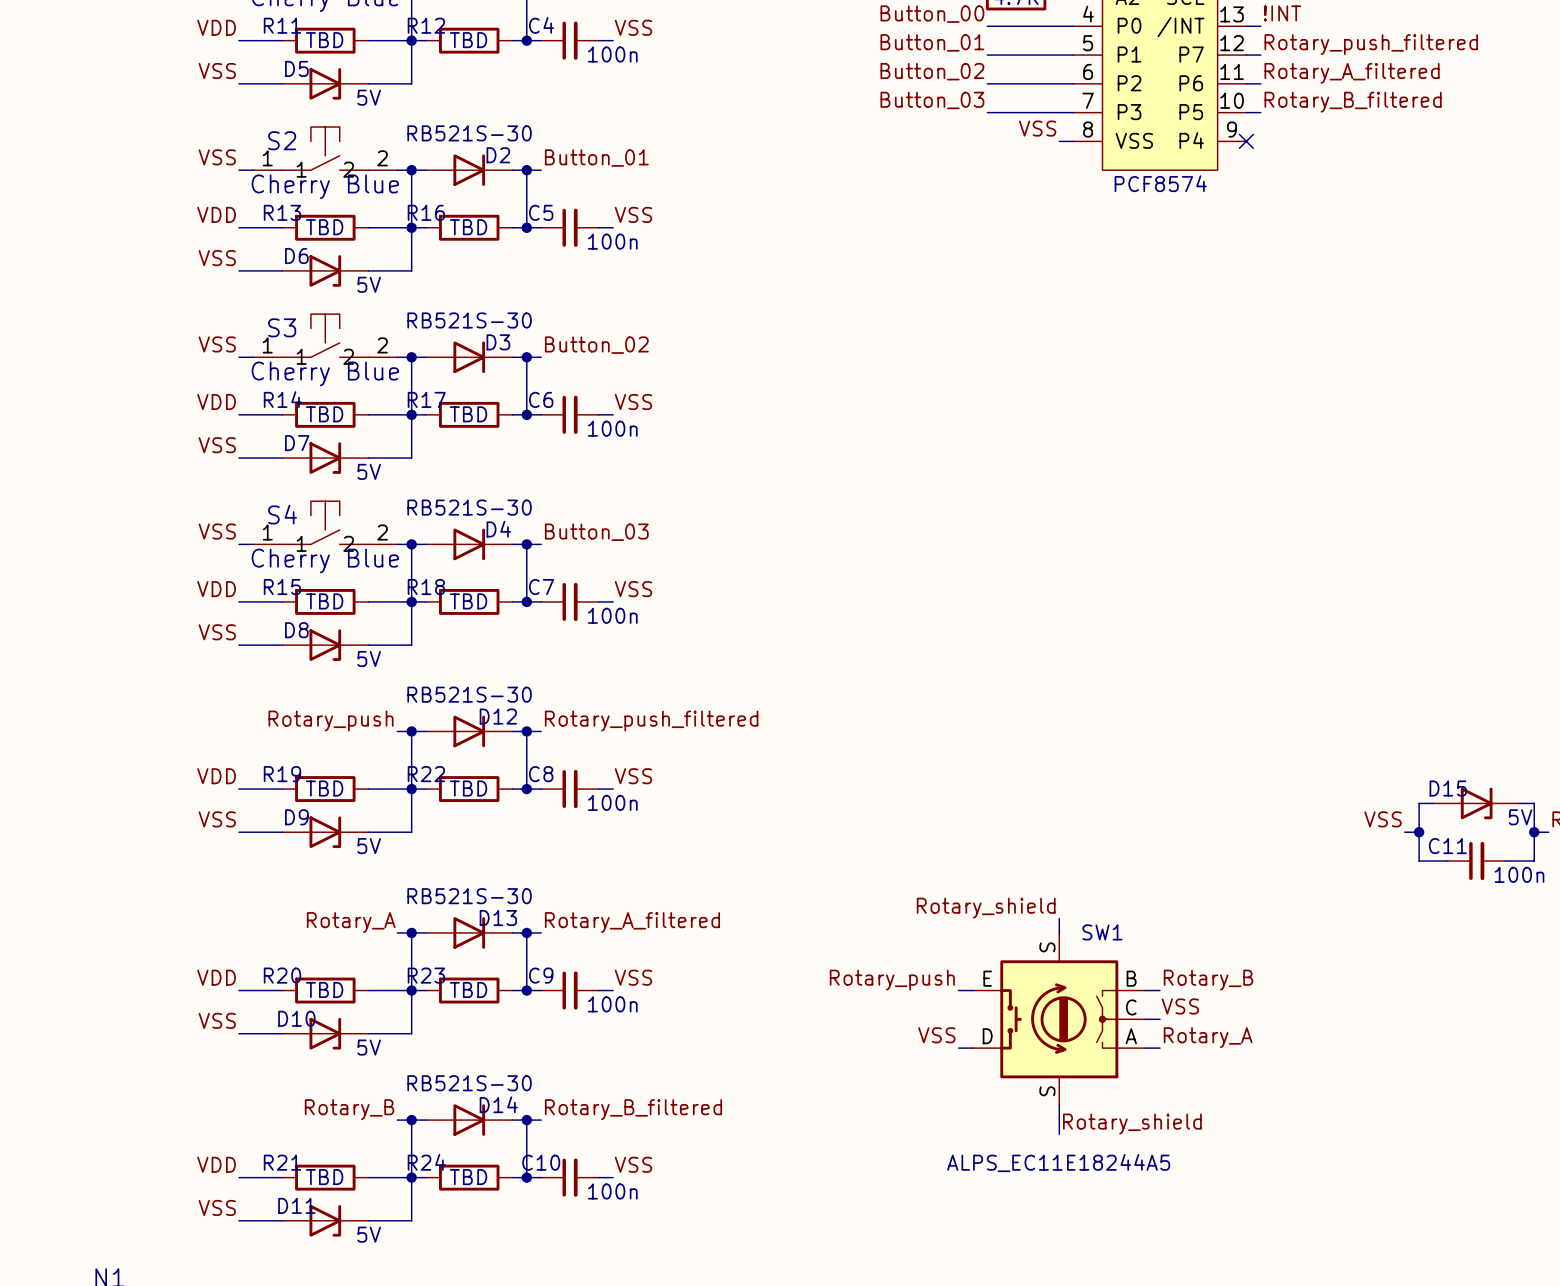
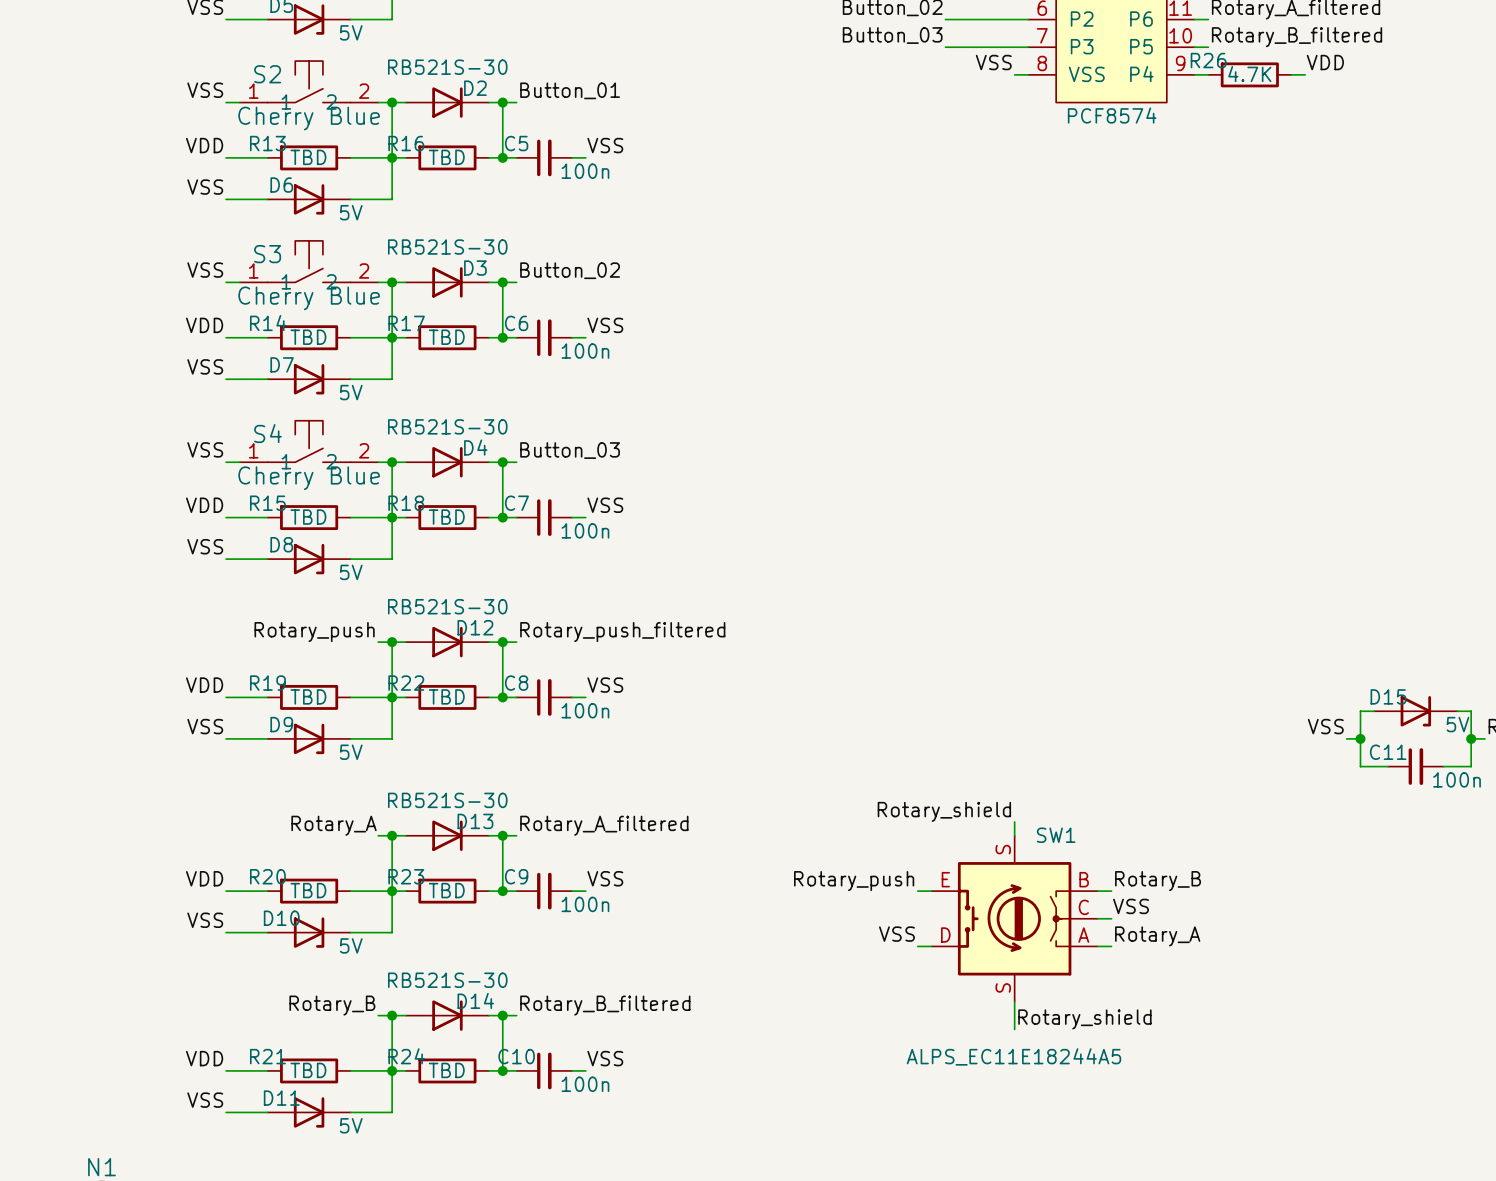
label: none -> VDD (1325, 62)
wire: none -> (1194, 74) (1208, 74)
no-connect mark: (1246, 141) -> none
R26: none -> 4.7K (1249, 74)
wire: none -> (1291, 74) (1305, 74)

